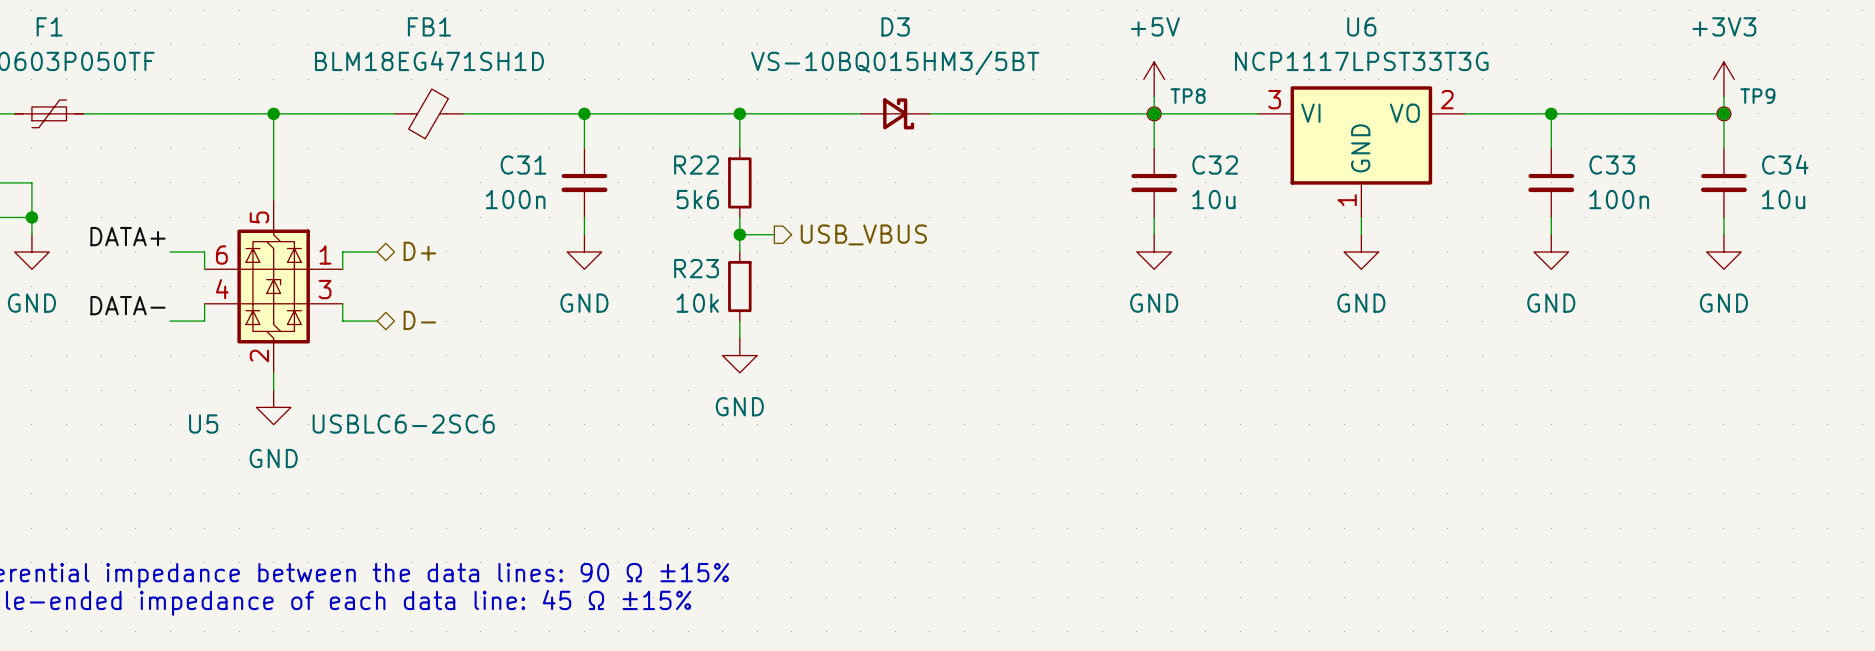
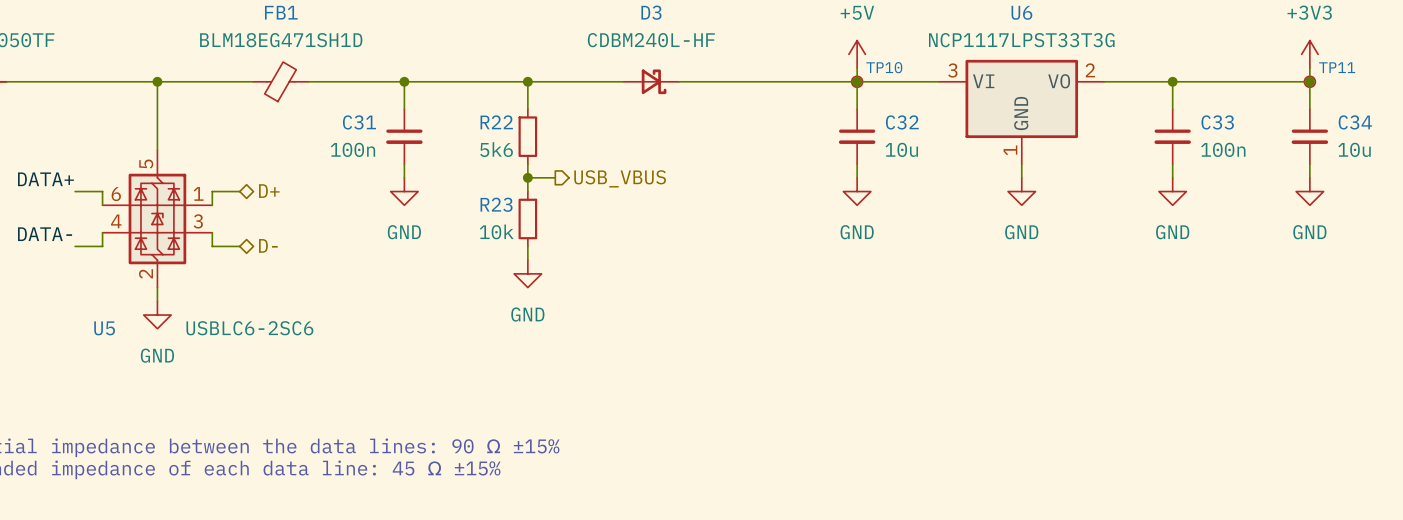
D3 value: VS-10BQ015HM3/5BT (895, 63) -> CDBM240L-HF (651, 40)
TP8 name: TP8 (1188, 96) -> TP10 (884, 67)
TP9 name: TP9 (1757, 96) -> TP11 (1337, 67)

